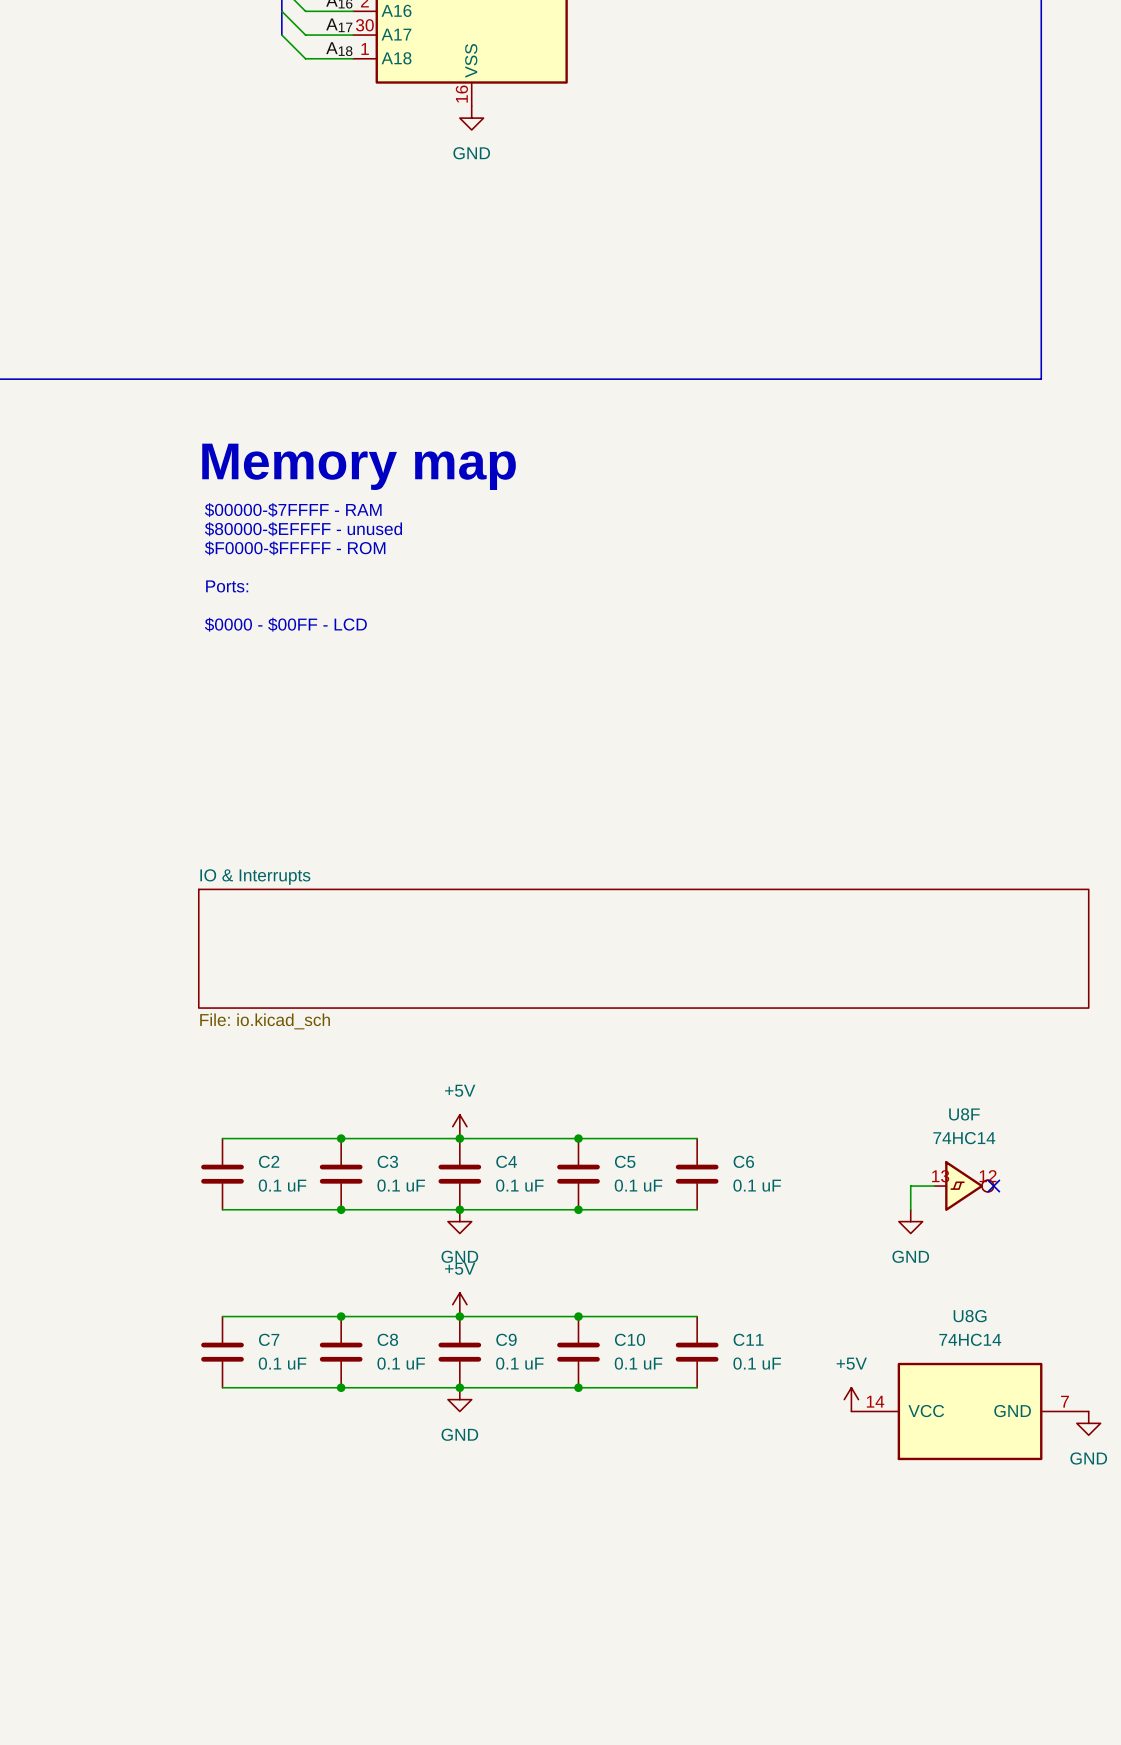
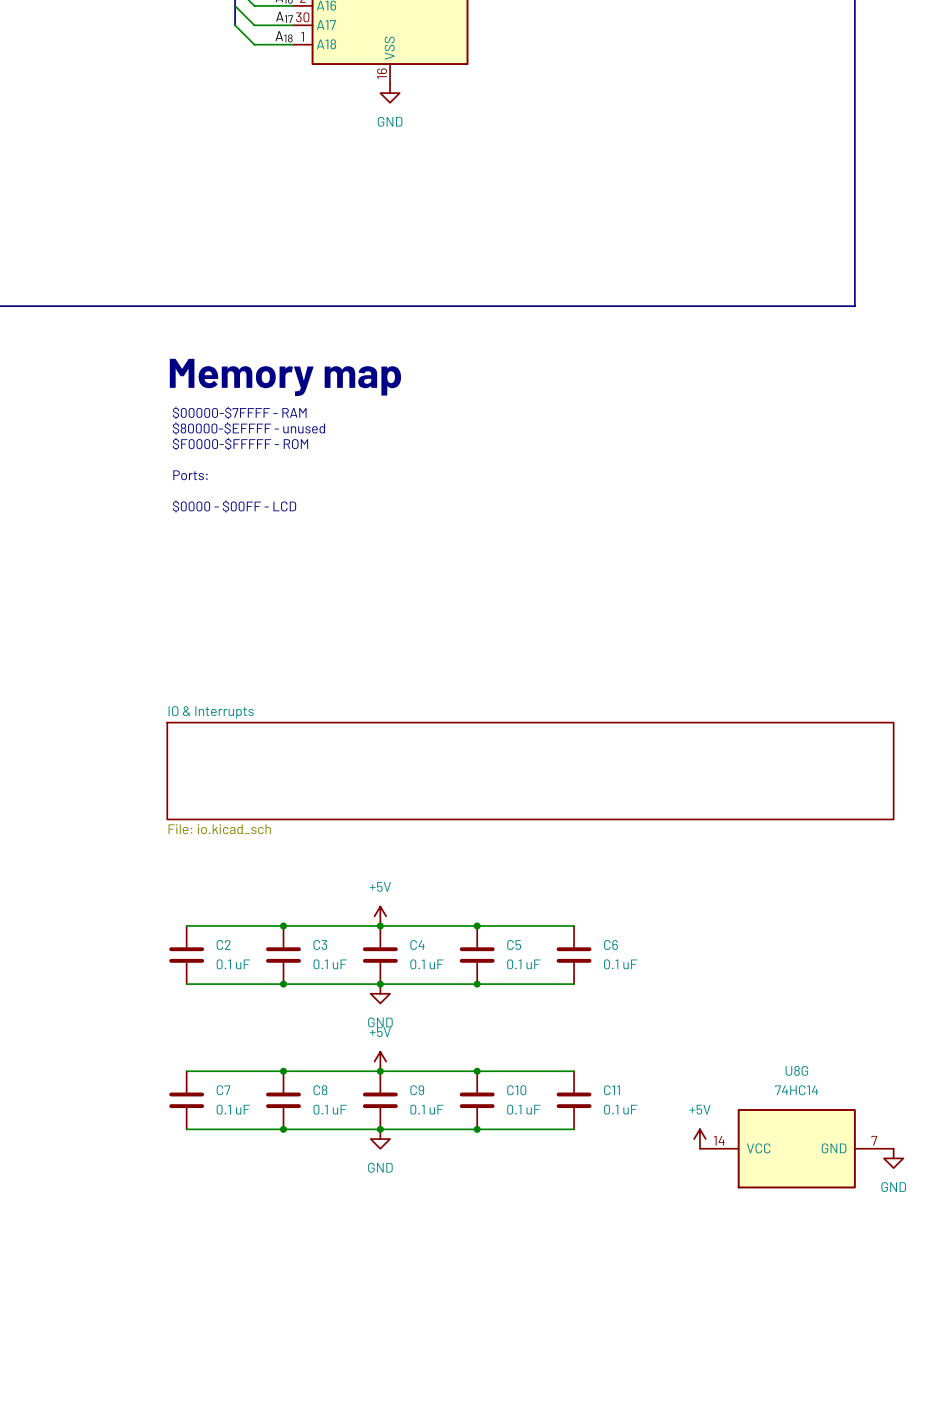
wire: (934, 1186) (910, 1186) (910, 1209) -> none
U8F: 74HC14 (964, 1186) -> none
no-connect mark: (993, 1186) -> none
power symbol: GND (910, 1221) -> none

